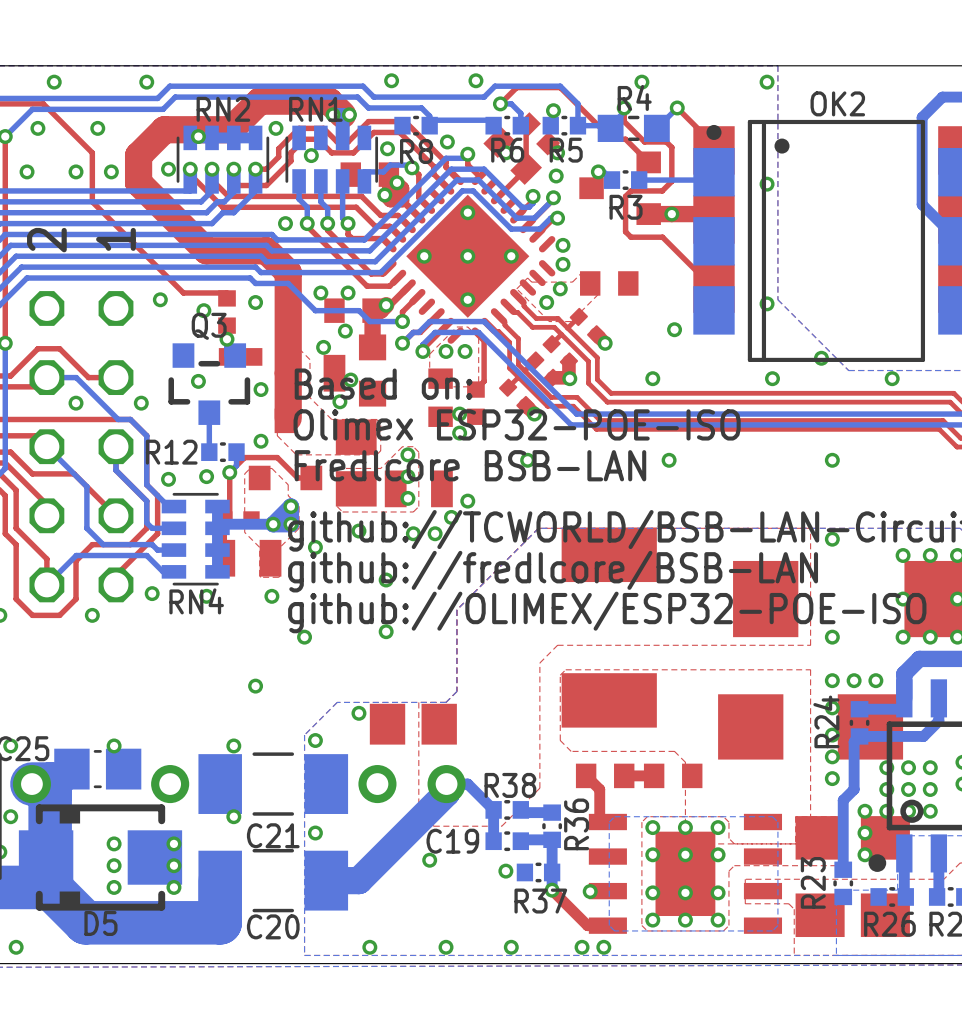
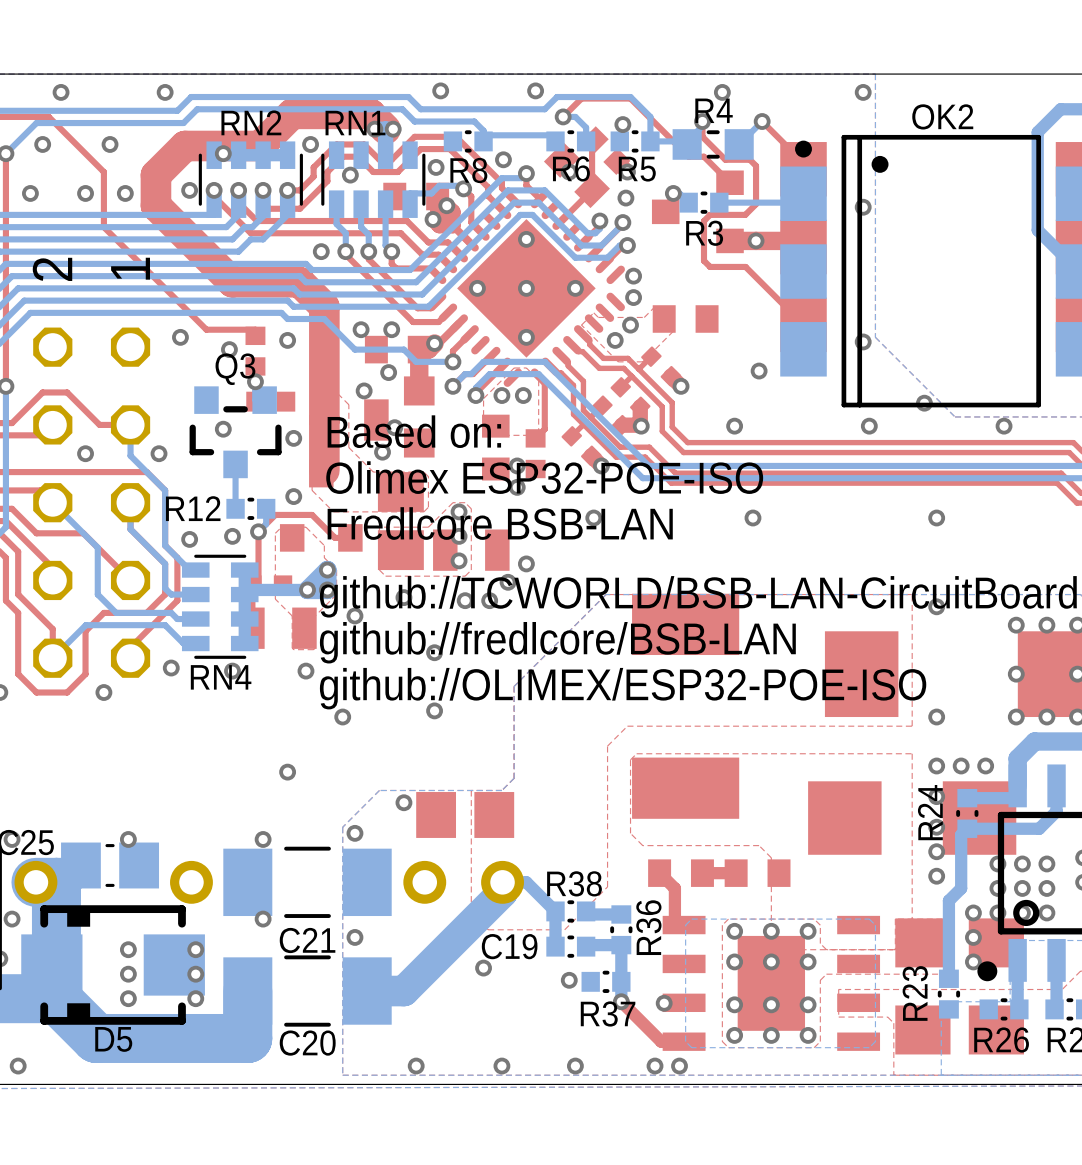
bottom track: (46, 377) (76, 377) (118, 419) (130, 419) -> (130, 424) (130, 455) (146, 472)

